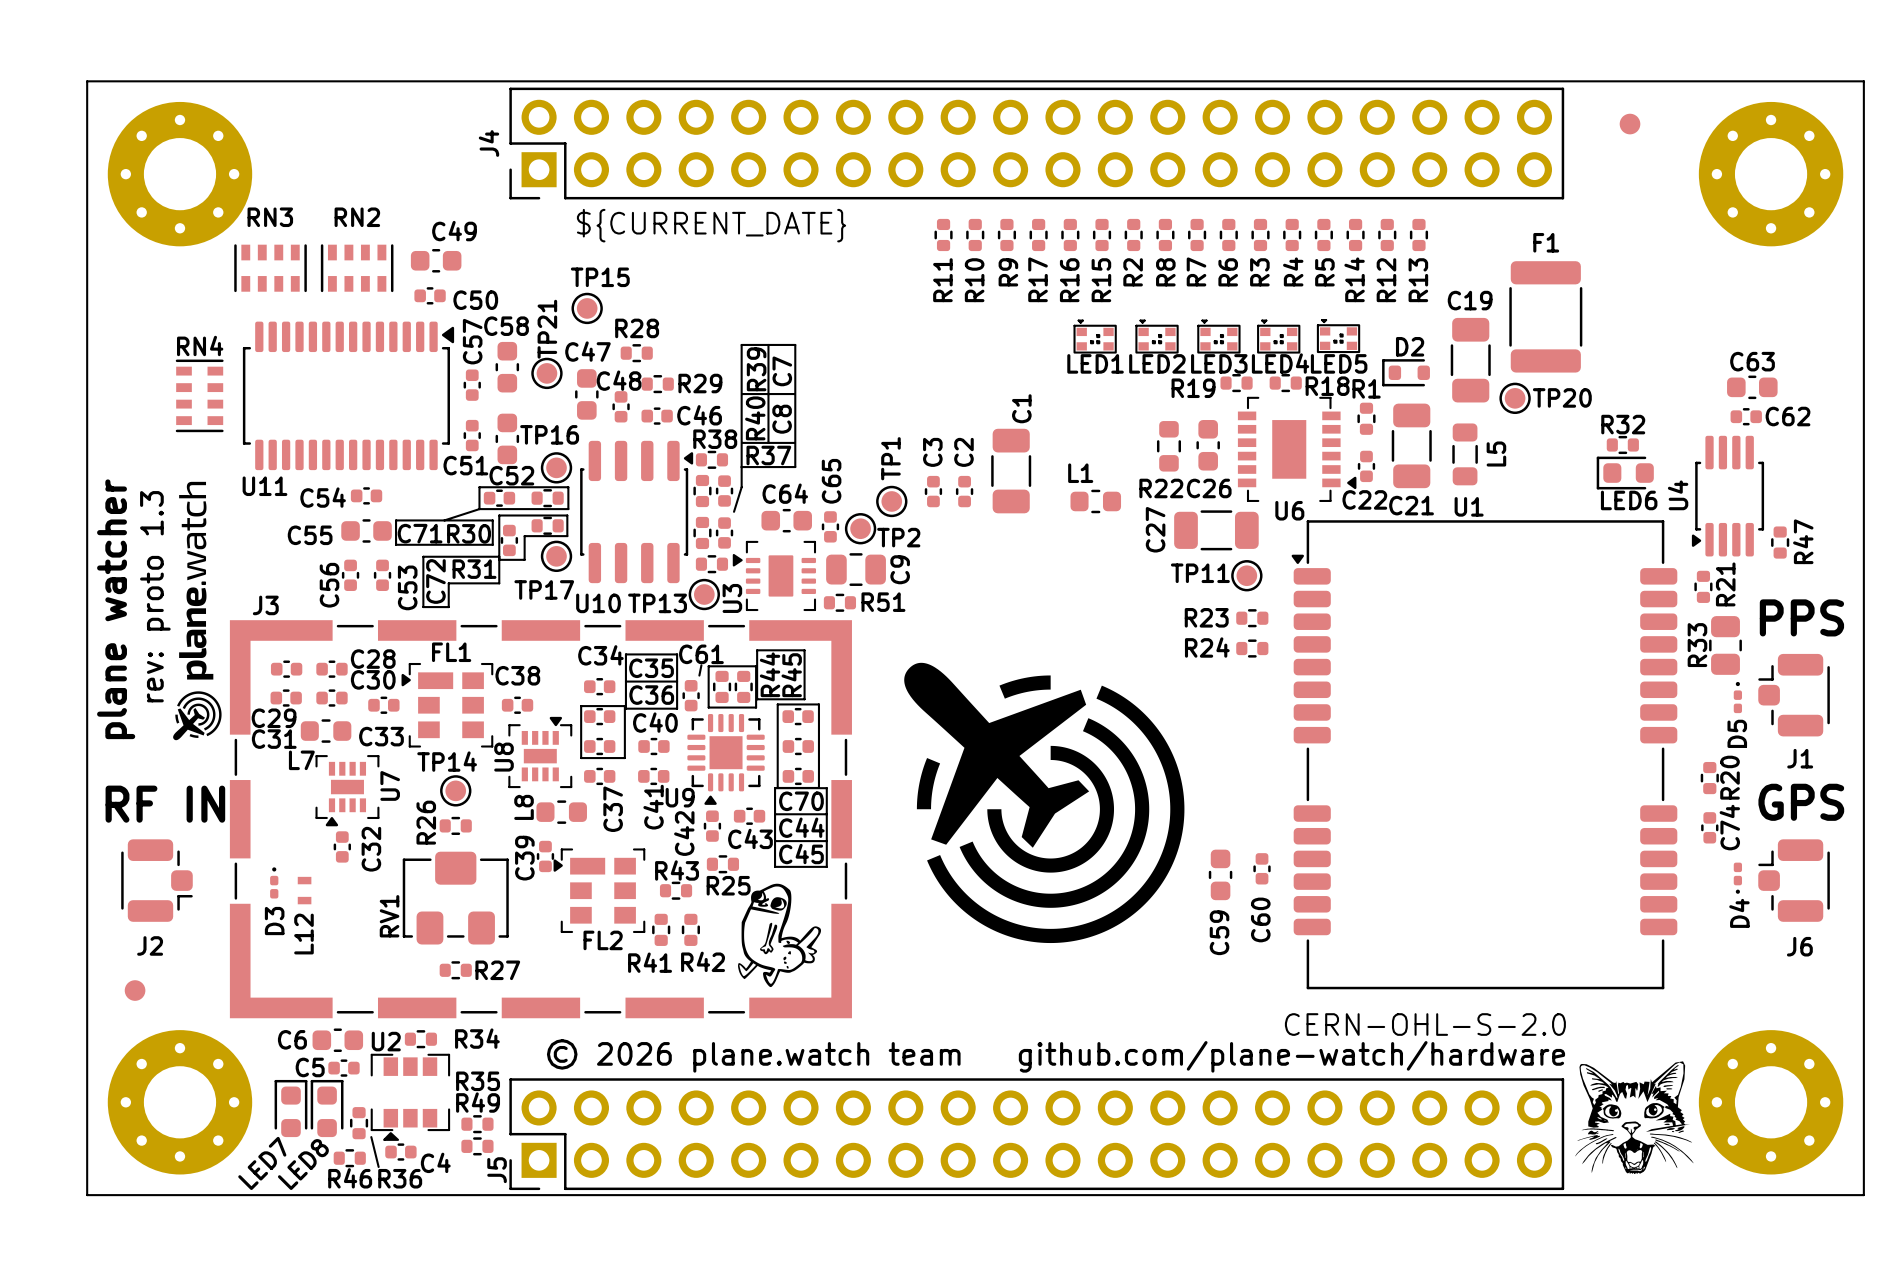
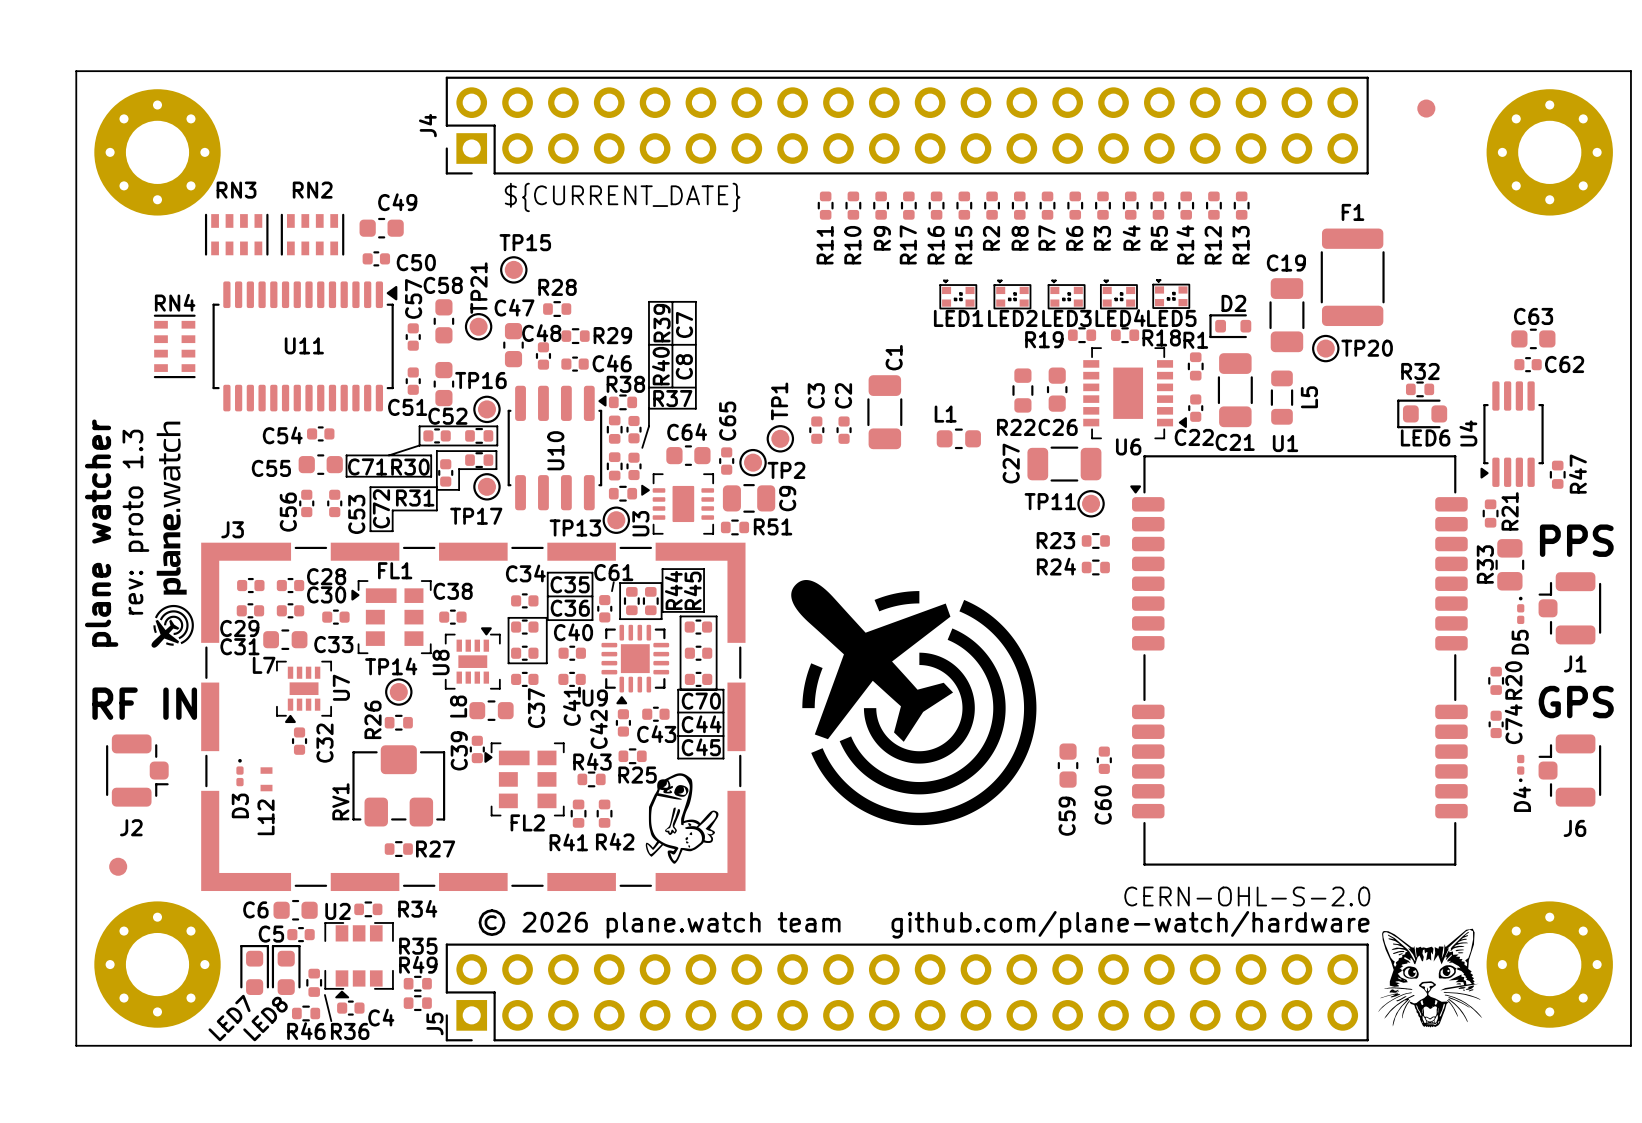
U11 name position: U11 (264, 486) -> U11 (304, 345)
U10 name rotation: 0° (598, 603) -> 90° counterclockwise (555, 450)
U10 name position: U10 (598, 603) -> U10 (555, 450)

